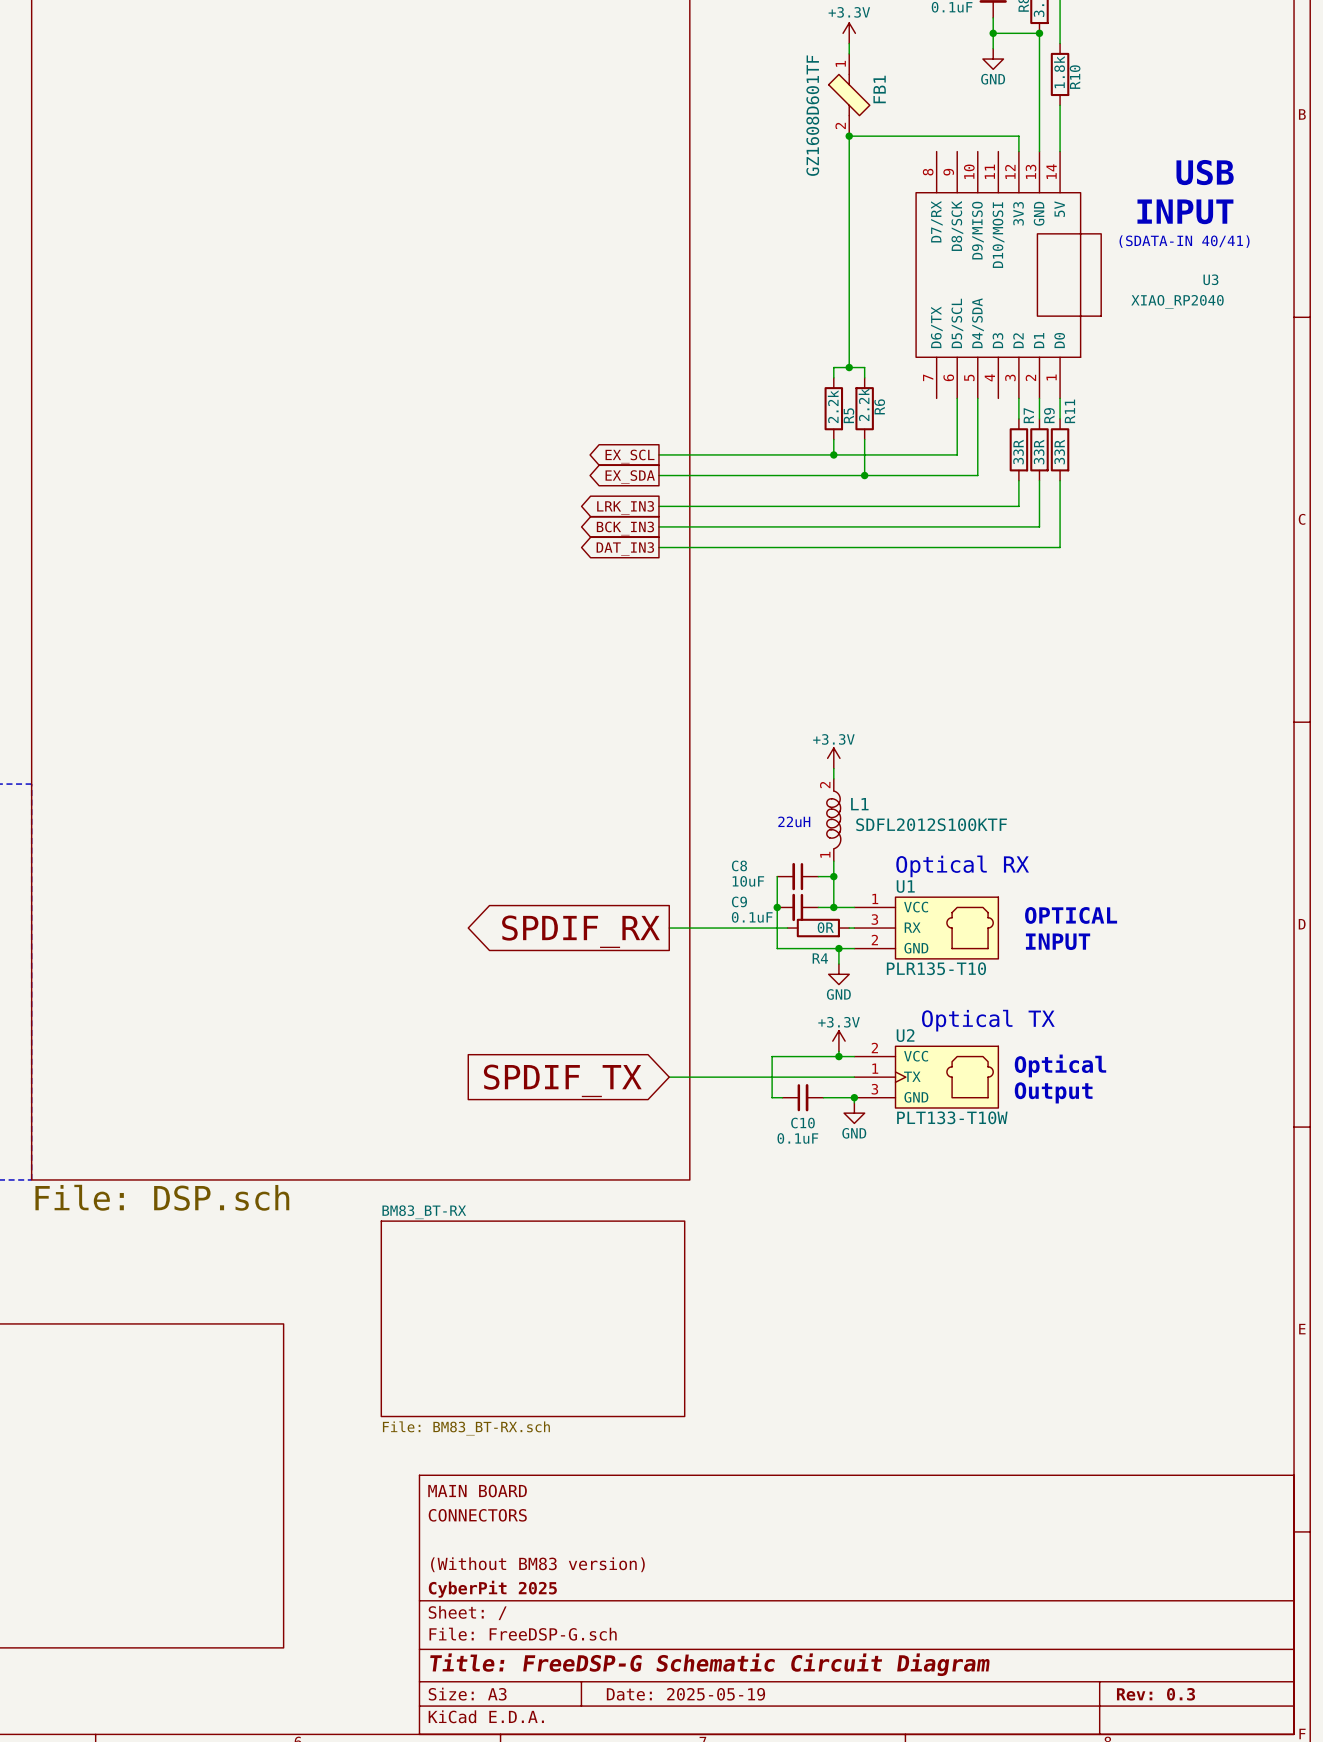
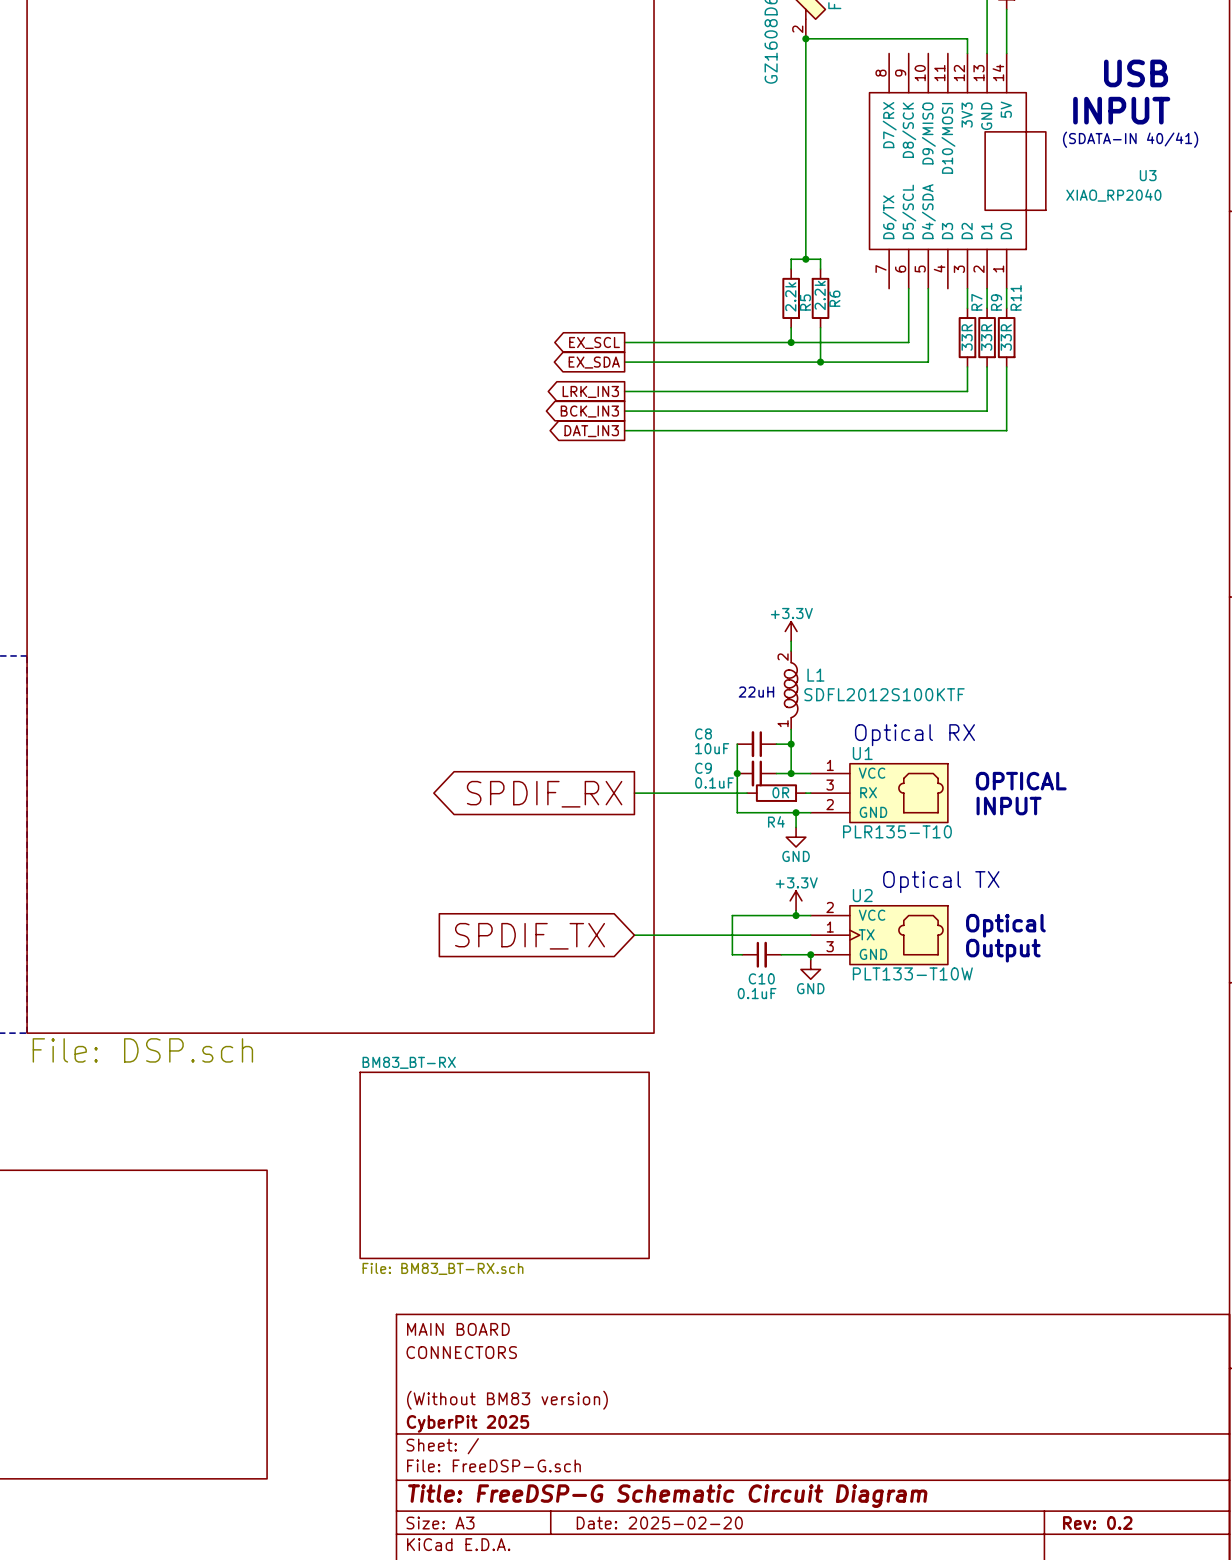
title block: Date: 2025-05-19 (685, 1694) -> Date: 2025-02-20 (659, 1523)
title block: Rev: 0.3 (1155, 1694) -> Rev: 0.2 (1097, 1523)

